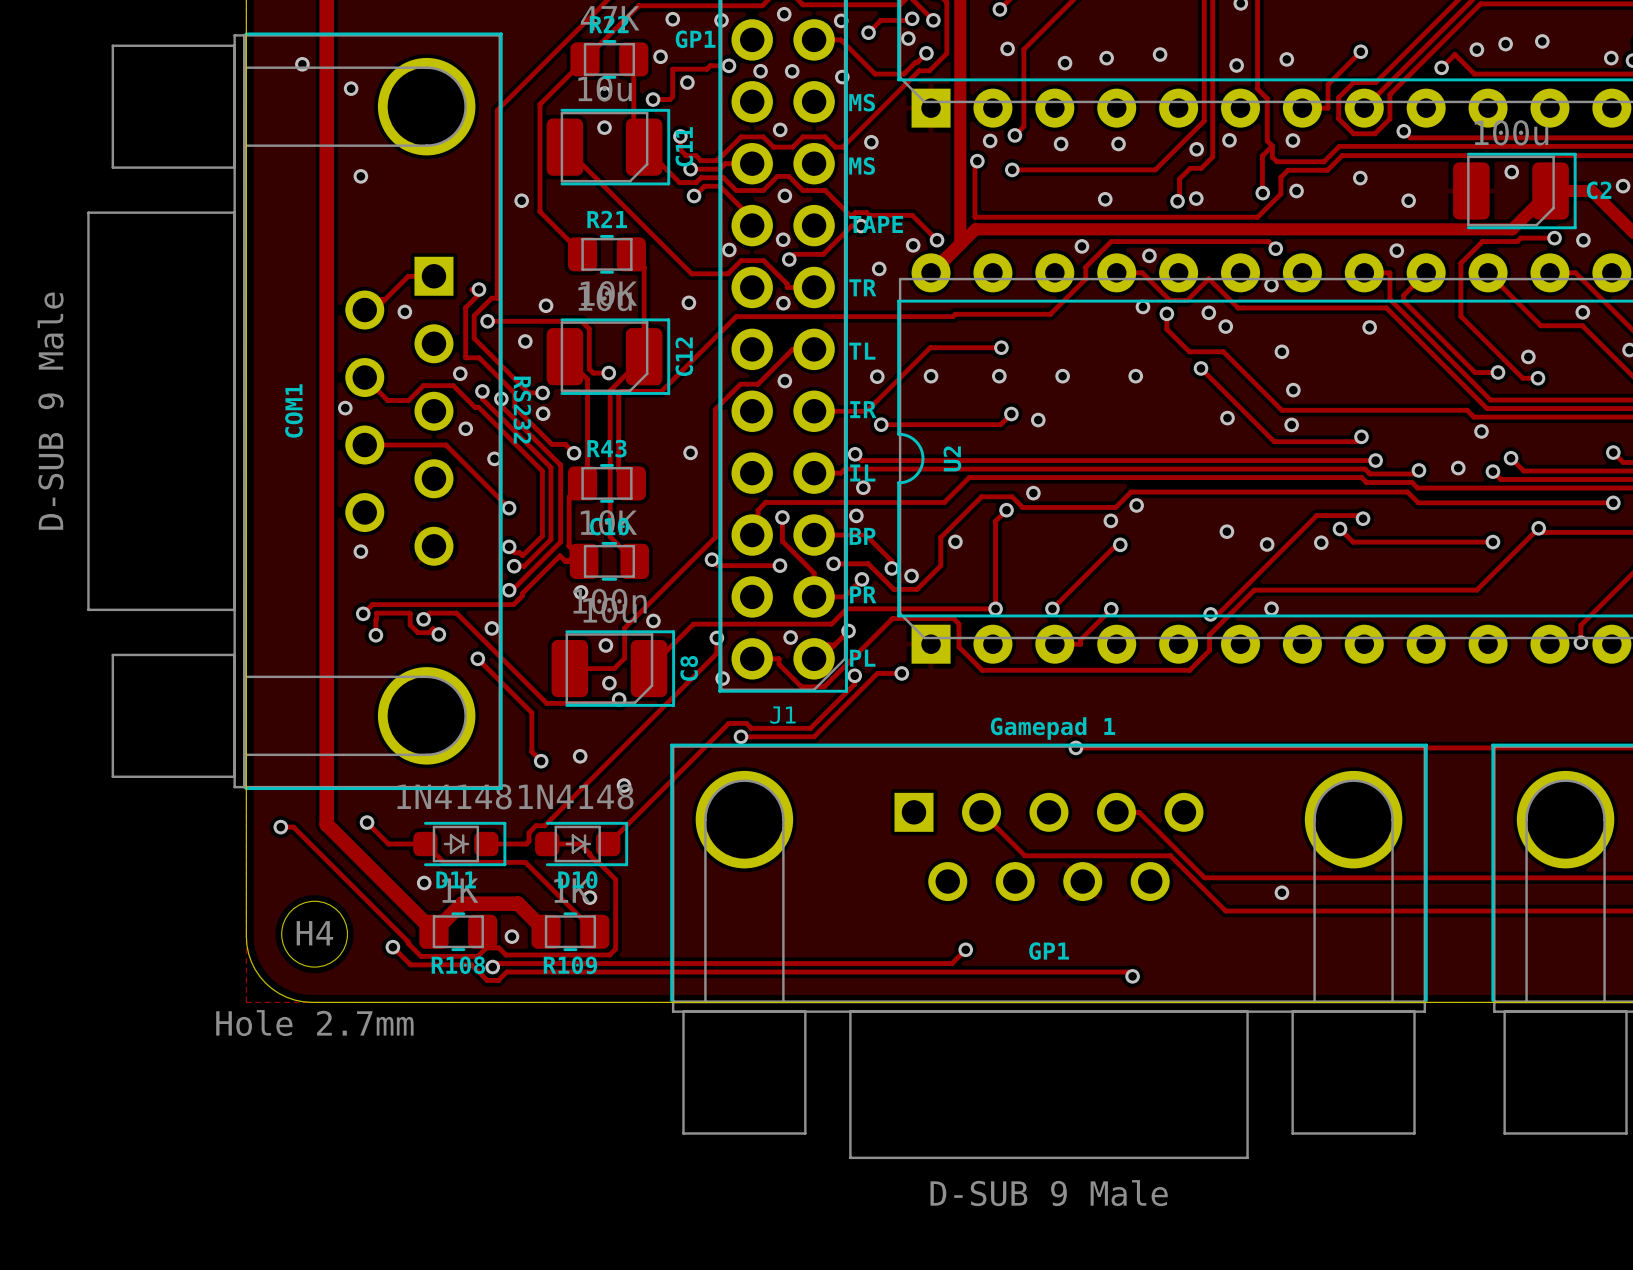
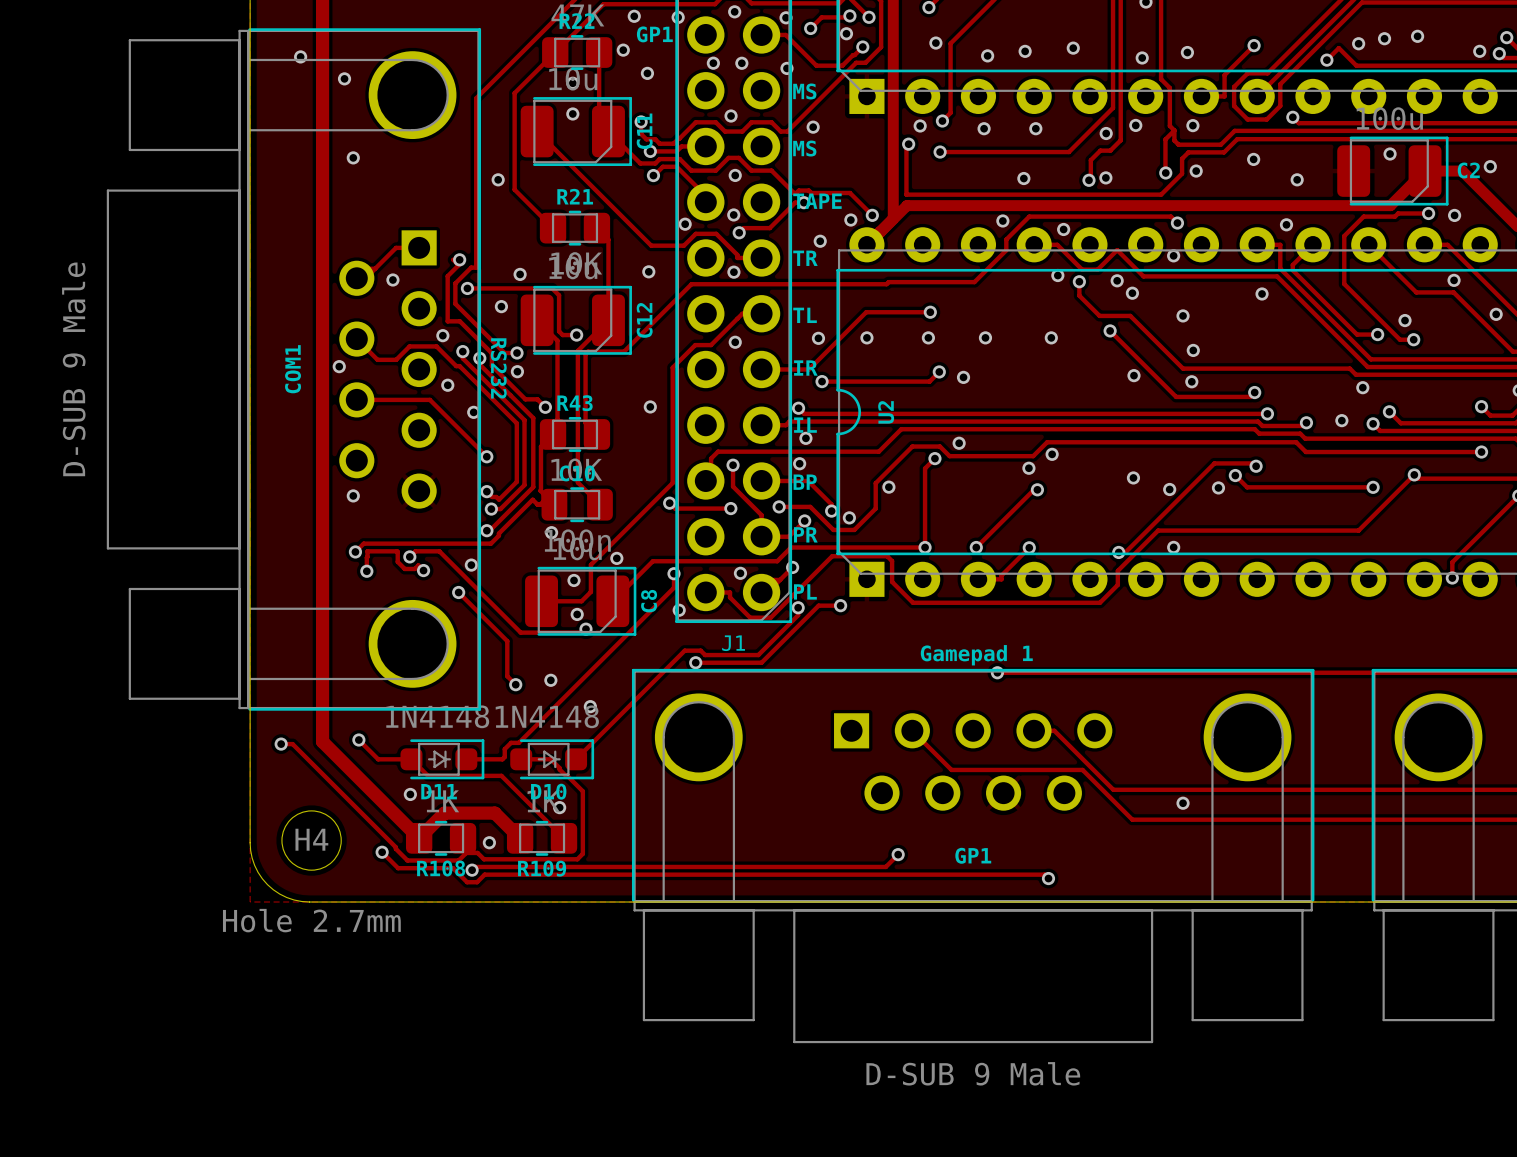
track: (728, 65) (710, 65) (706, 69) (672, 69) (672, 96) (669, 99) (653, 99) -> none
via: (728, 65) -> none
via: (653, 99) -> none

